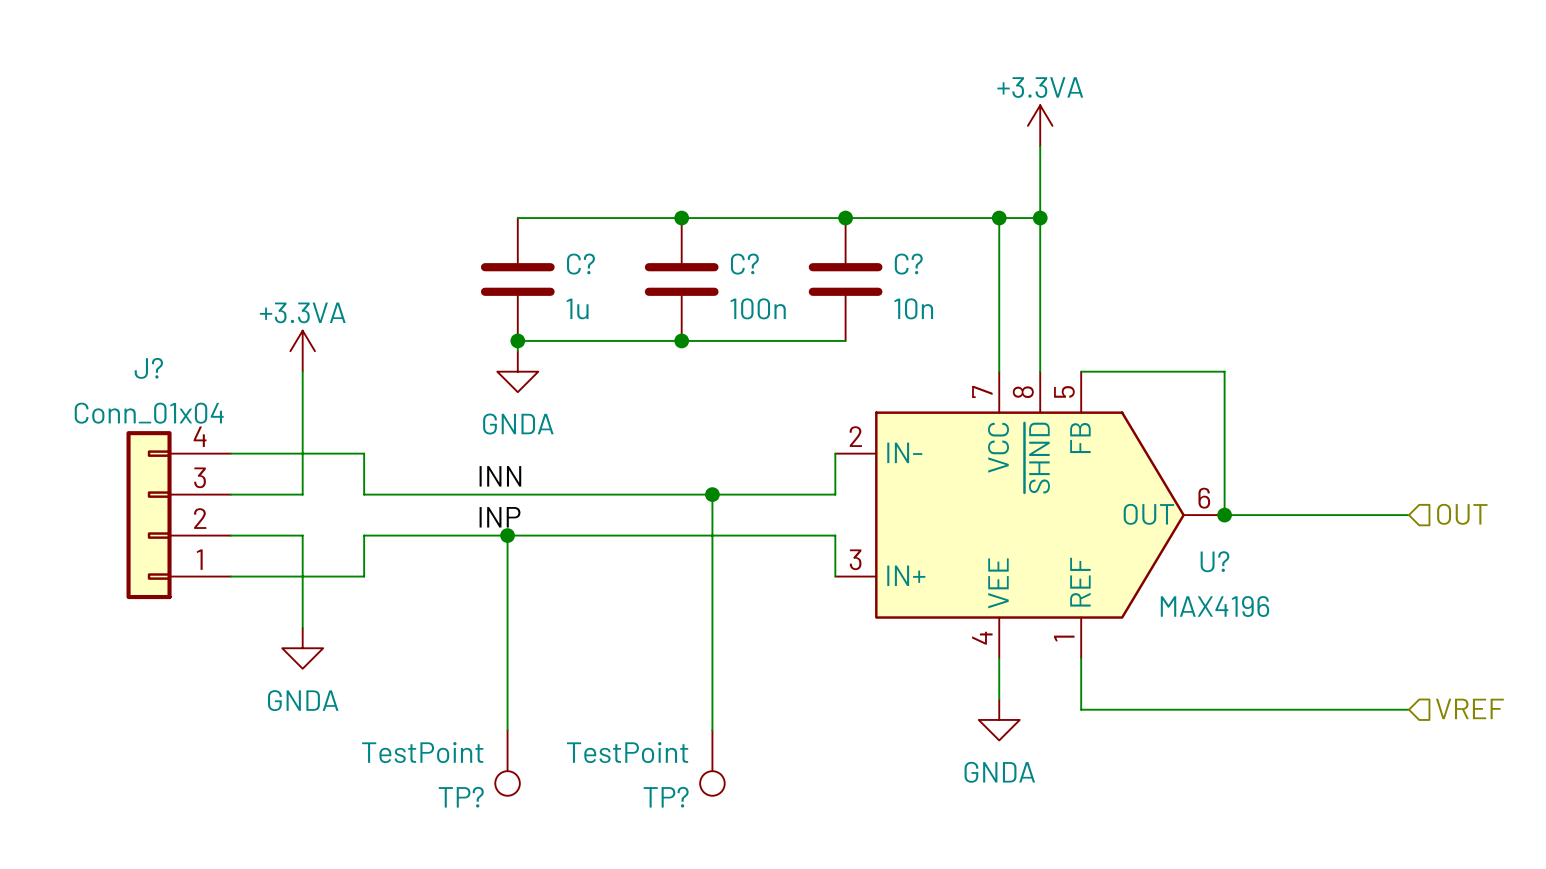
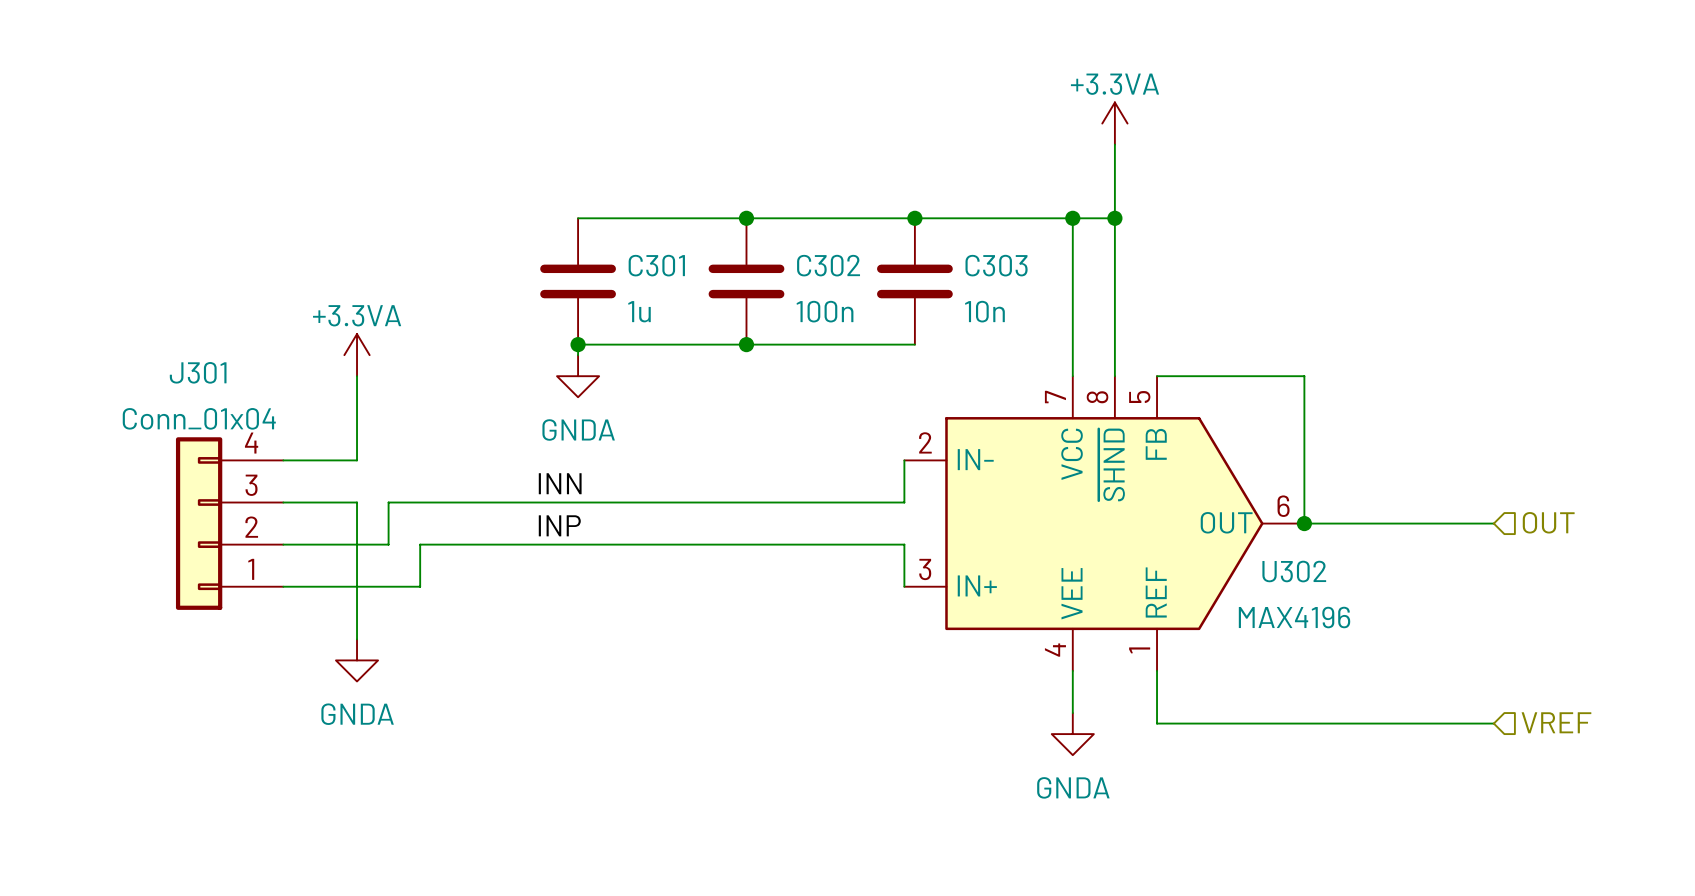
C? name: C? (580, 264) -> C301 (656, 265)
C? name: C? (744, 264) -> C302 (828, 265)
C? name: C? (908, 264) -> C303 (996, 265)
J? name: J? (148, 368) -> J301 (198, 372)
wire: (302, 494) (302, 453) (364, 453) (364, 494) -> (357, 502) (357, 544) (388, 544) (388, 502) (420, 502)
wire: (712, 494) (712, 730) -> none
junction: (712, 494) -> none
wire: (507, 535) (507, 730) -> none
junction: (507, 535) -> none
U? name: U? (1214, 561) -> U302 (1294, 571)
TP?: TestPoint (507, 762) -> none
TP?: TestPoint (712, 762) -> none

